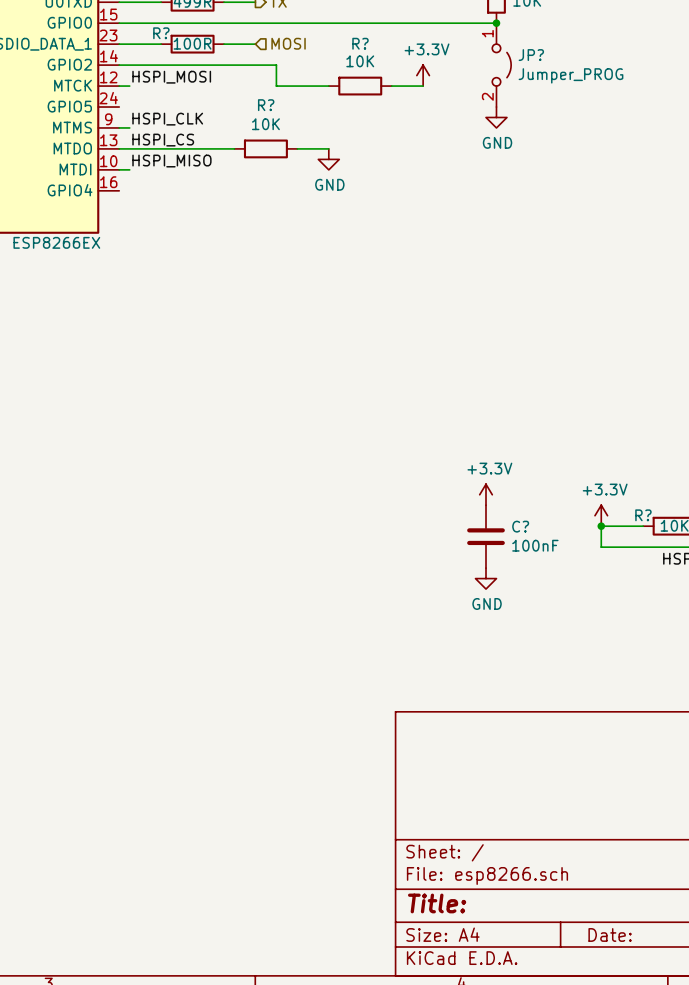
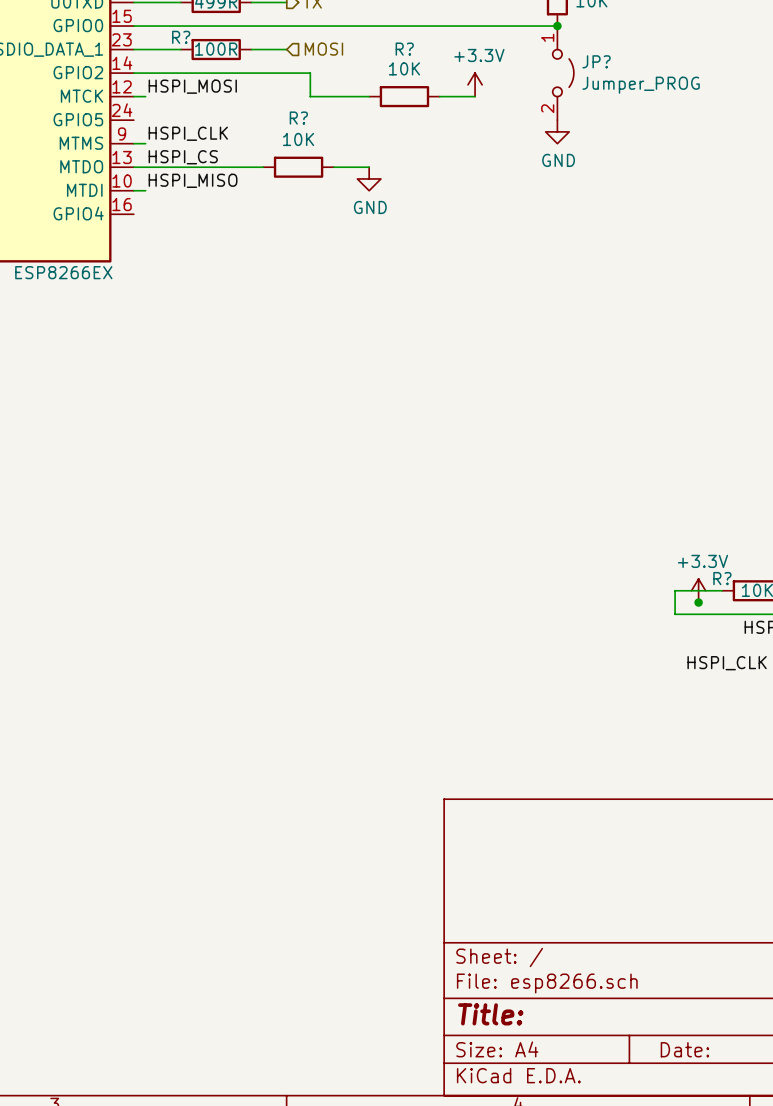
power symbol: +3.3V (486, 494) -> none
power symbol position: +3.3V (601, 515) -> +3.3V (698, 590)
junction position: (601, 526) -> (698, 602)
C?: 100nF (486, 536) -> none
power symbol: GND (486, 578) -> none
label: none -> HSPI_CLK (727, 663)

